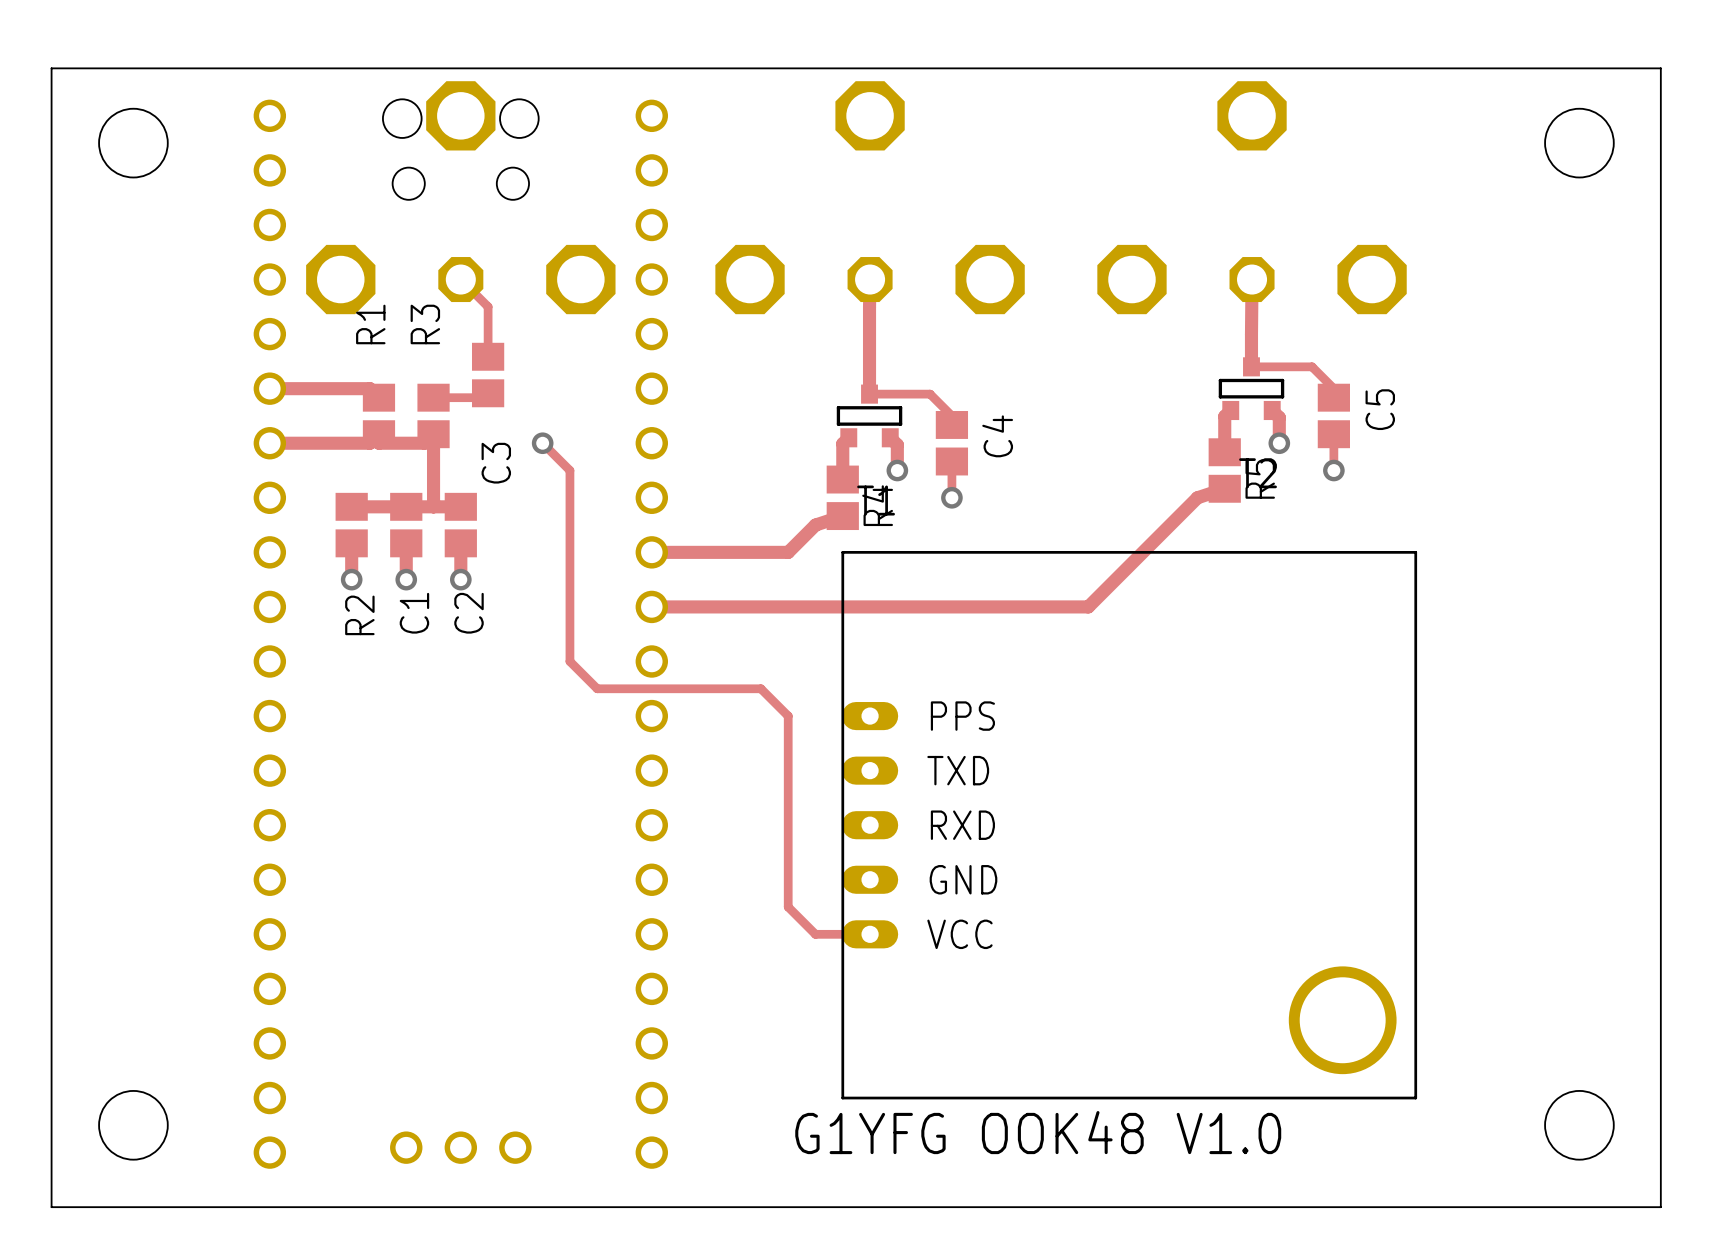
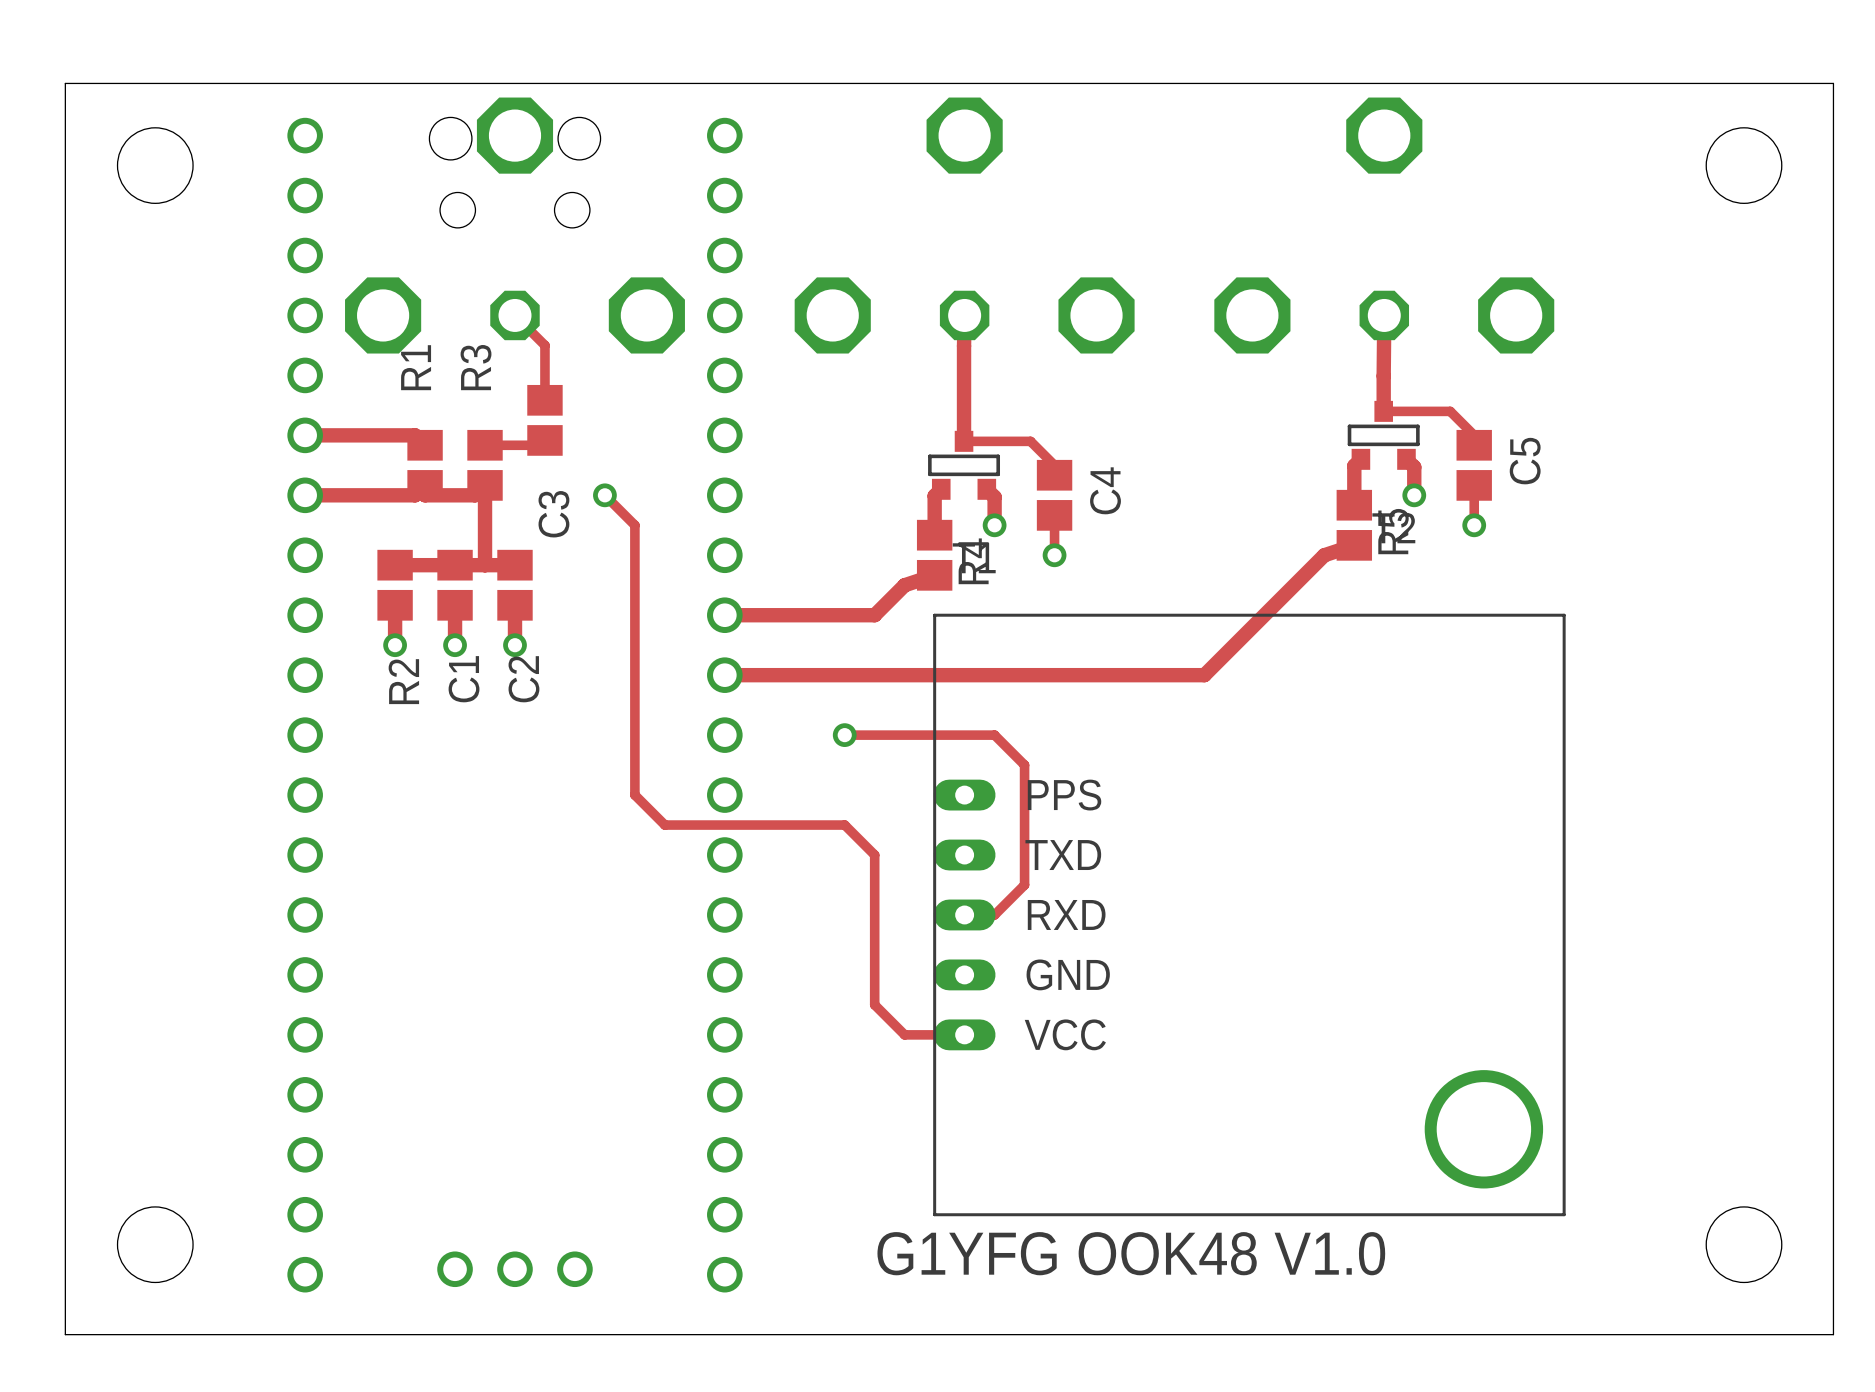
track: (569, 661) (597, 688) (760, 688) (788, 716) (788, 770) -> (634, 735) (634, 795) (664, 825) (844, 825) (874, 855)
track: none -> (844, 735) (994, 735) (1024, 765) (1024, 885) (994, 914) (964, 914)
via: none -> (844, 735)

